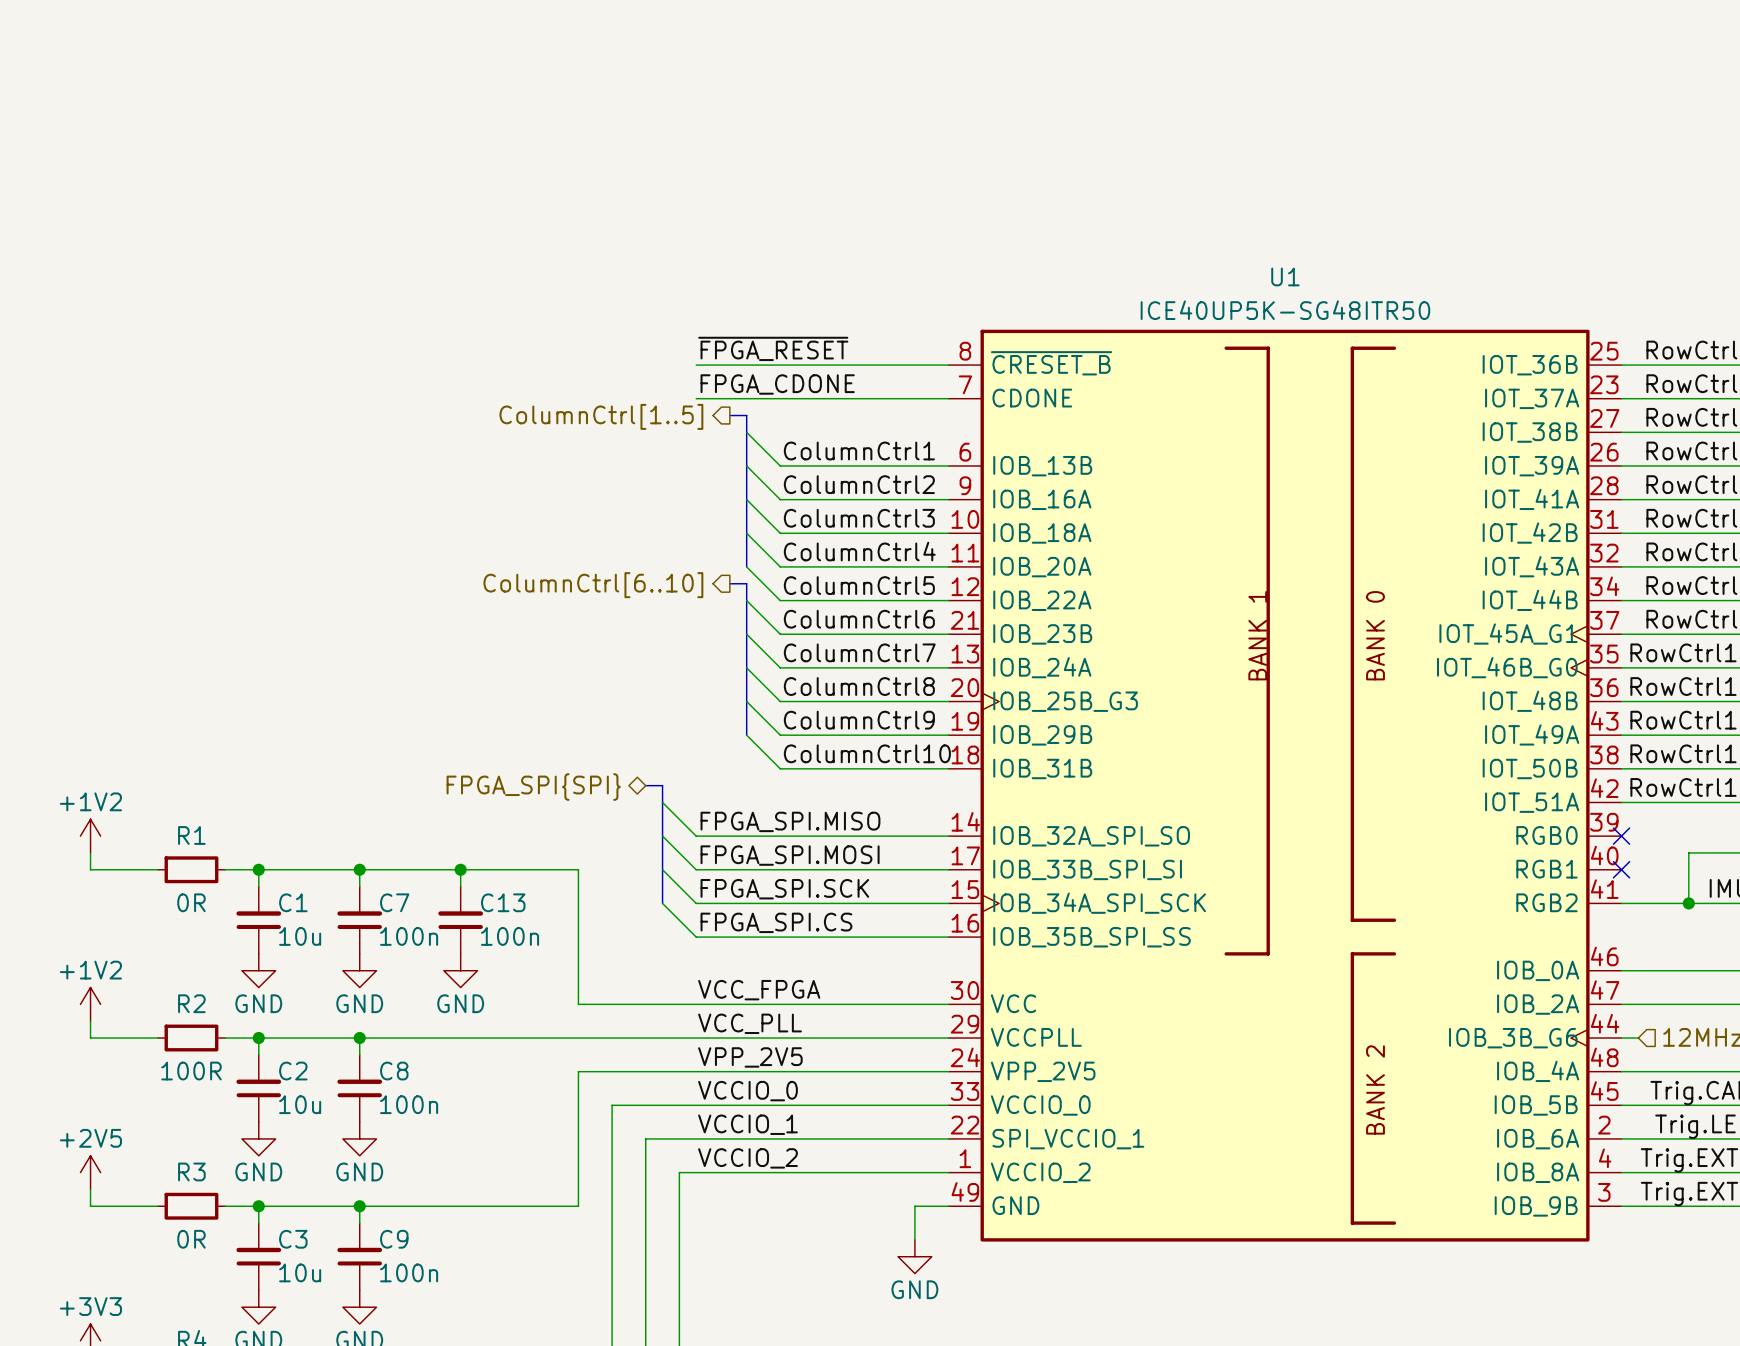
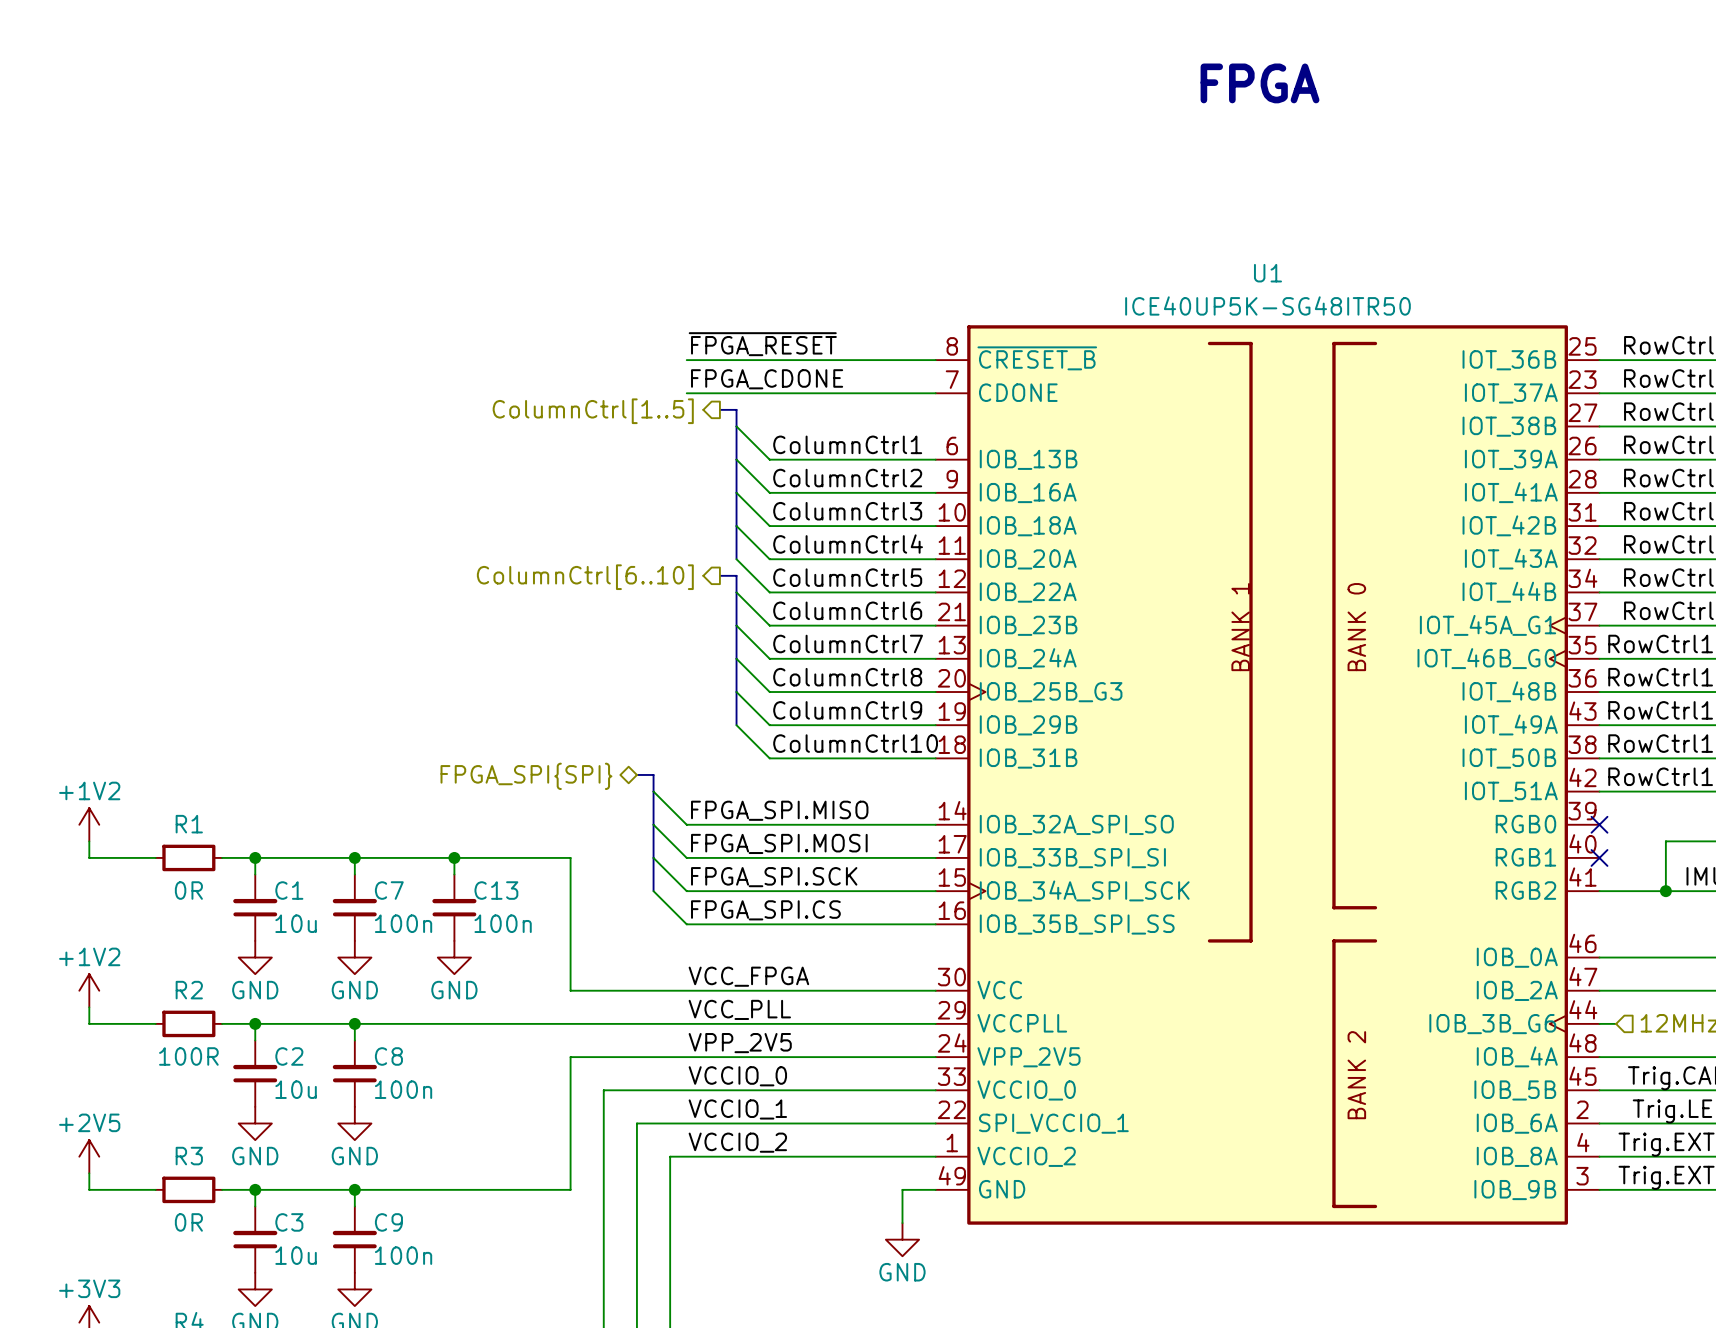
text: none -> FPGA (1260, 83)

